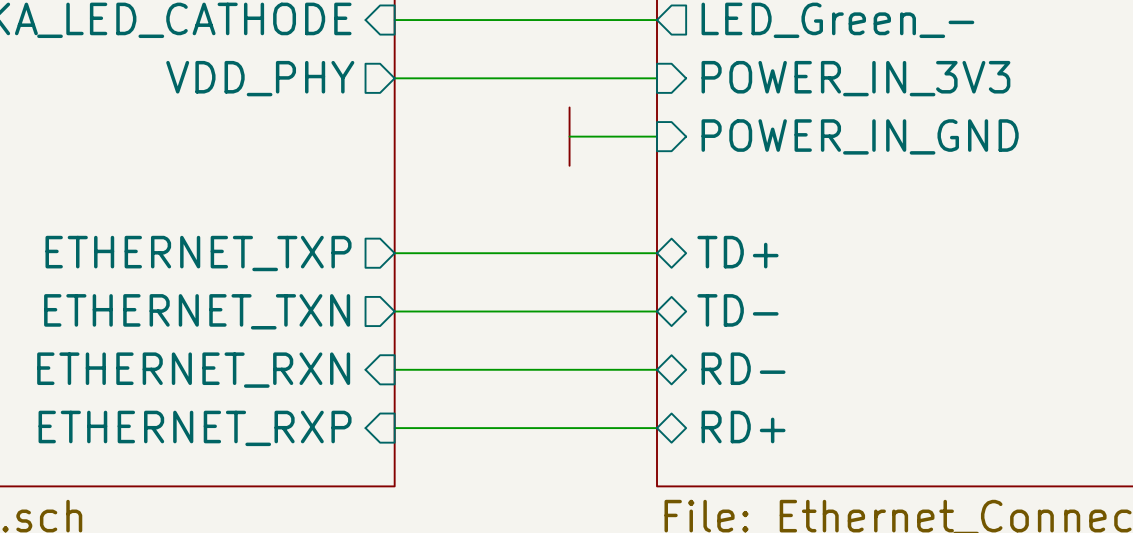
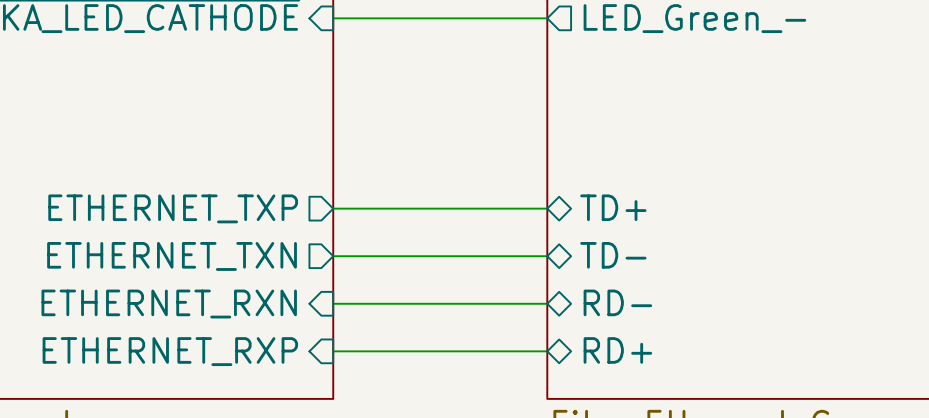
sheet pin: VDD_PHY (260, 78) -> none
wire: (394, 78) (657, 78) -> none
sheet pin: POWER_IN_3V3 (855, 78) -> none
wire: (569, 136) (657, 136) -> none
power symbol: (569, 136) -> none
sheet pin: POWER_IN_GND (860, 136) -> none

